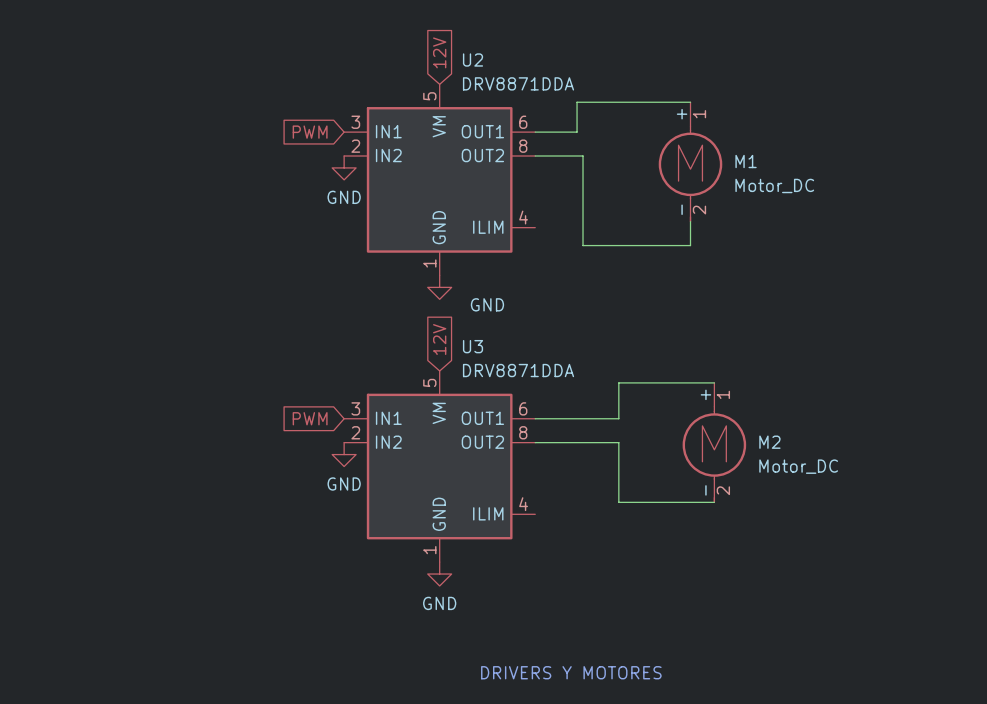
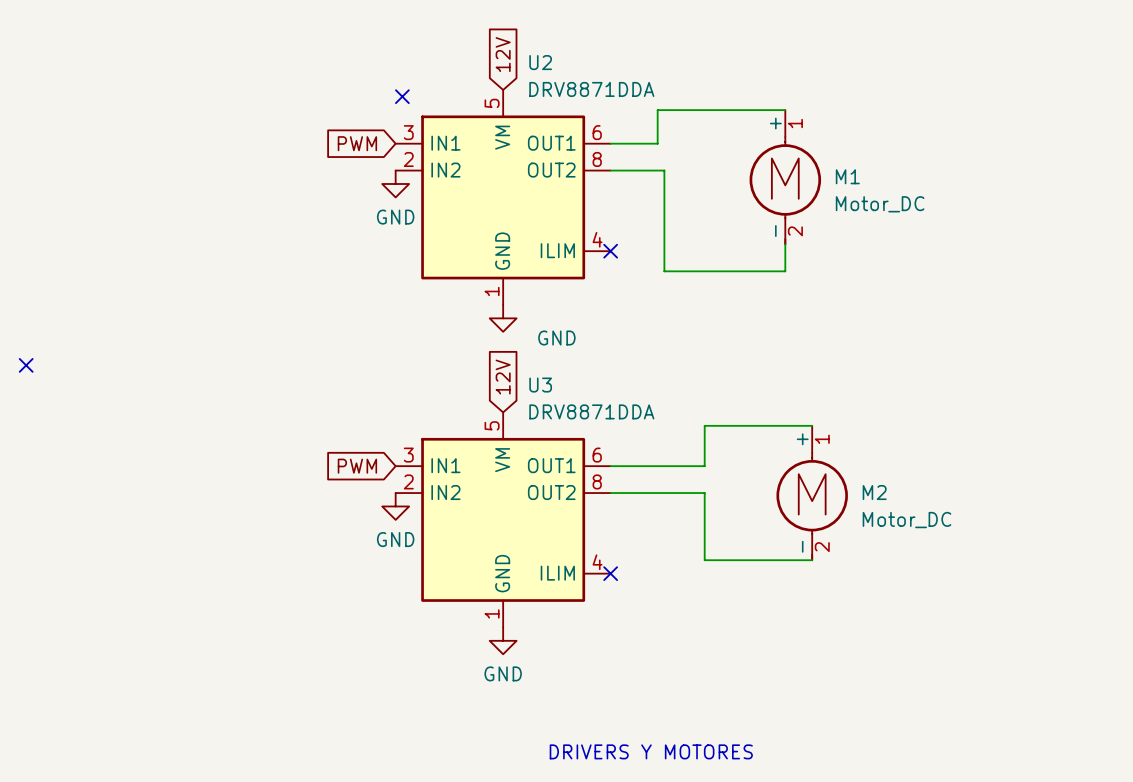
no-connect mark: none -> (402, 96)
no-connect mark: none -> (610, 251)
no-connect mark: none -> (26, 365)
no-connect mark: none -> (610, 573)

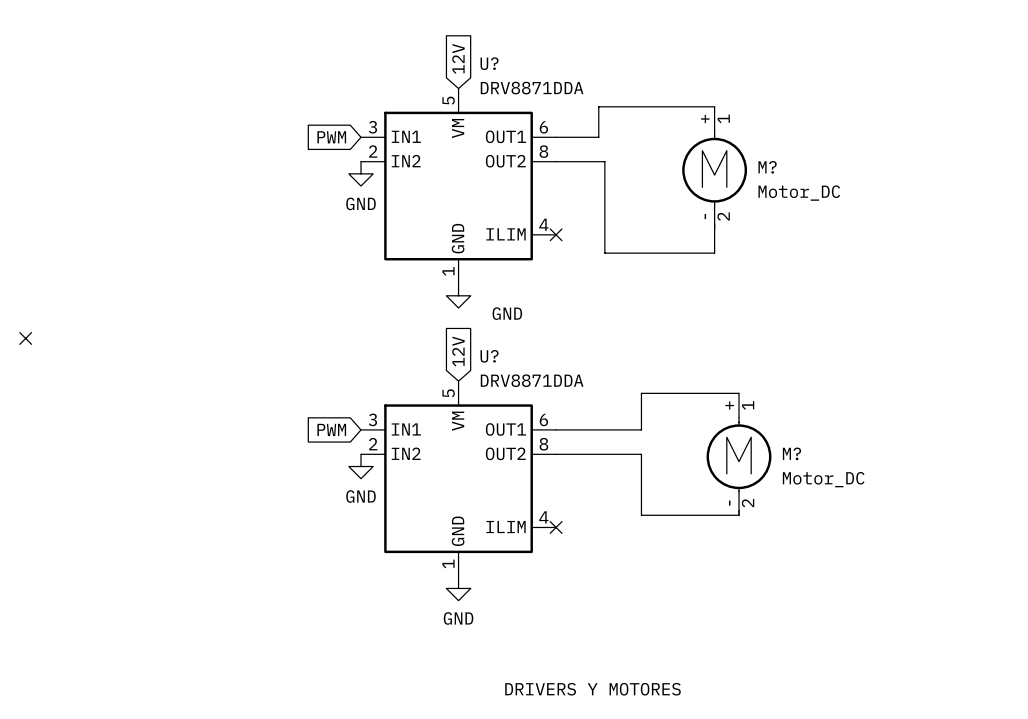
U2 name: U2 (540, 62) -> U? (489, 63)
no-connect mark: (402, 96) -> none
M1 name: M1 (847, 176) -> M? (767, 167)
U3 name: U3 (540, 385) -> U? (489, 356)
M2 name: M2 (874, 492) -> M? (791, 453)

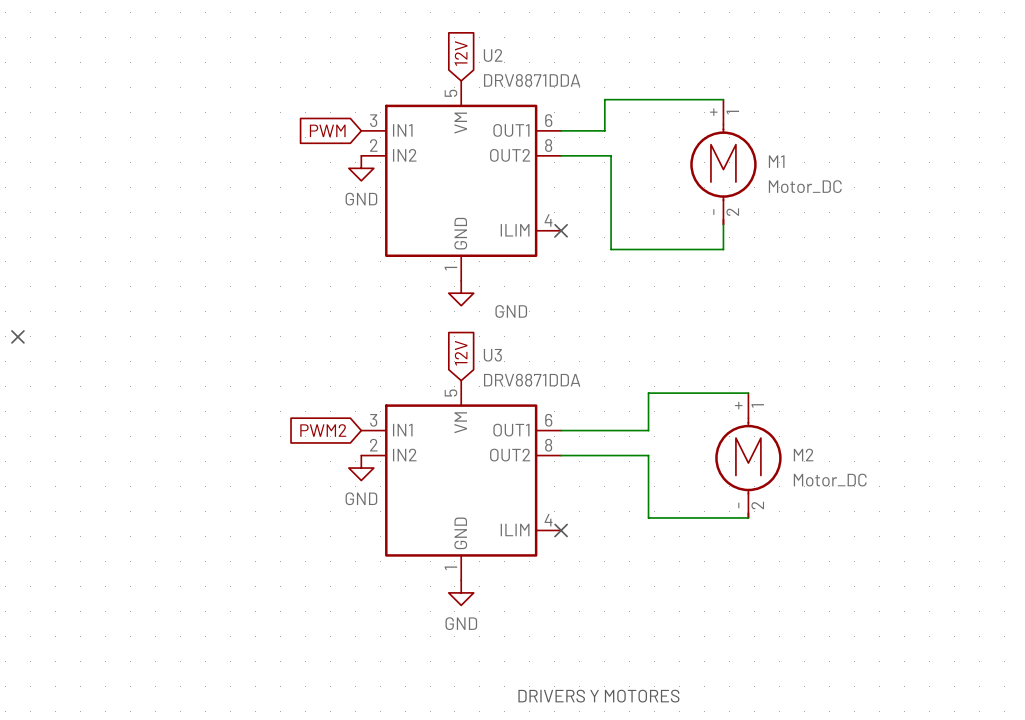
U? name: U? (489, 63) -> U2 (493, 55)
M? name: M? (767, 167) -> M1 (776, 161)
U? name: U? (489, 356) -> U3 (492, 355)
global label: PWM (331, 429) -> PWM2 (323, 430)
M? name: M? (791, 453) -> M2 (803, 455)

